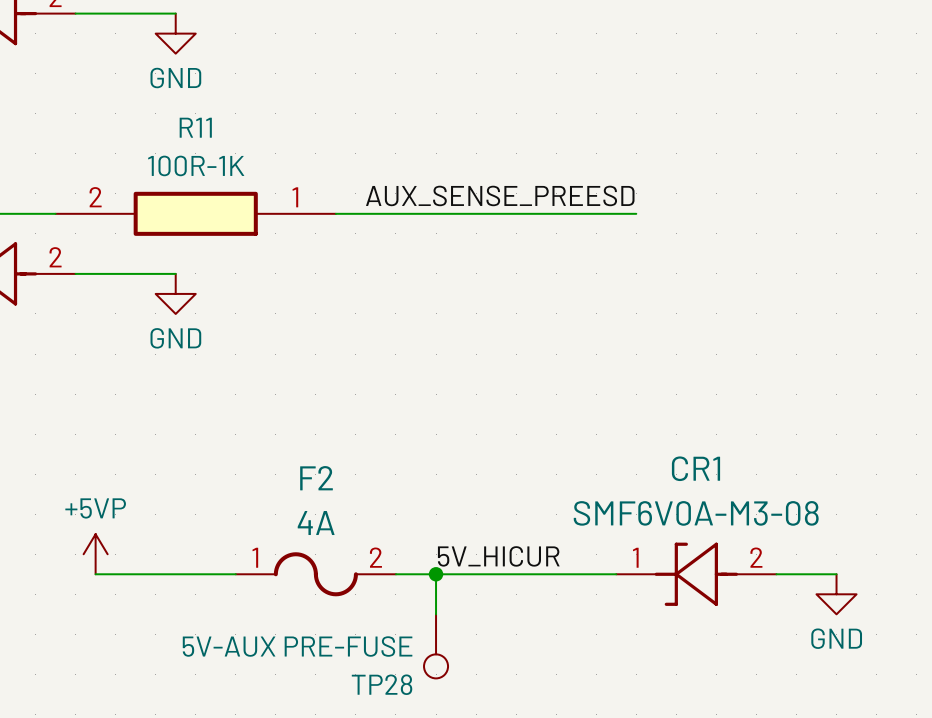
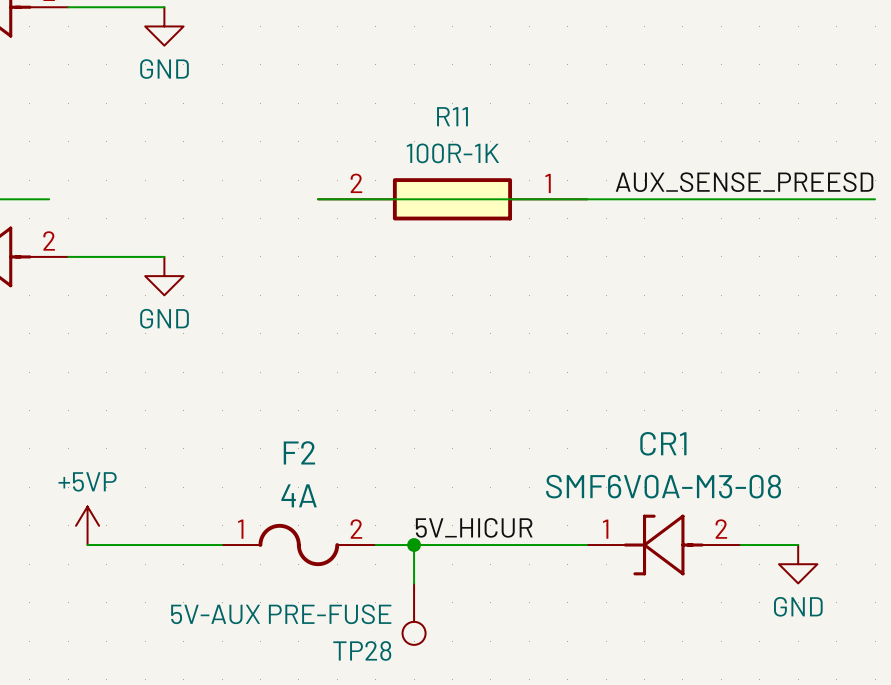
label position: AUX_SENSE_PREESD (500, 195) -> AUX_SENSE_PREESD (744, 182)
R11 position: (195, 213) -> (452, 199)
wire: none -> (606, 199) (875, 199)

